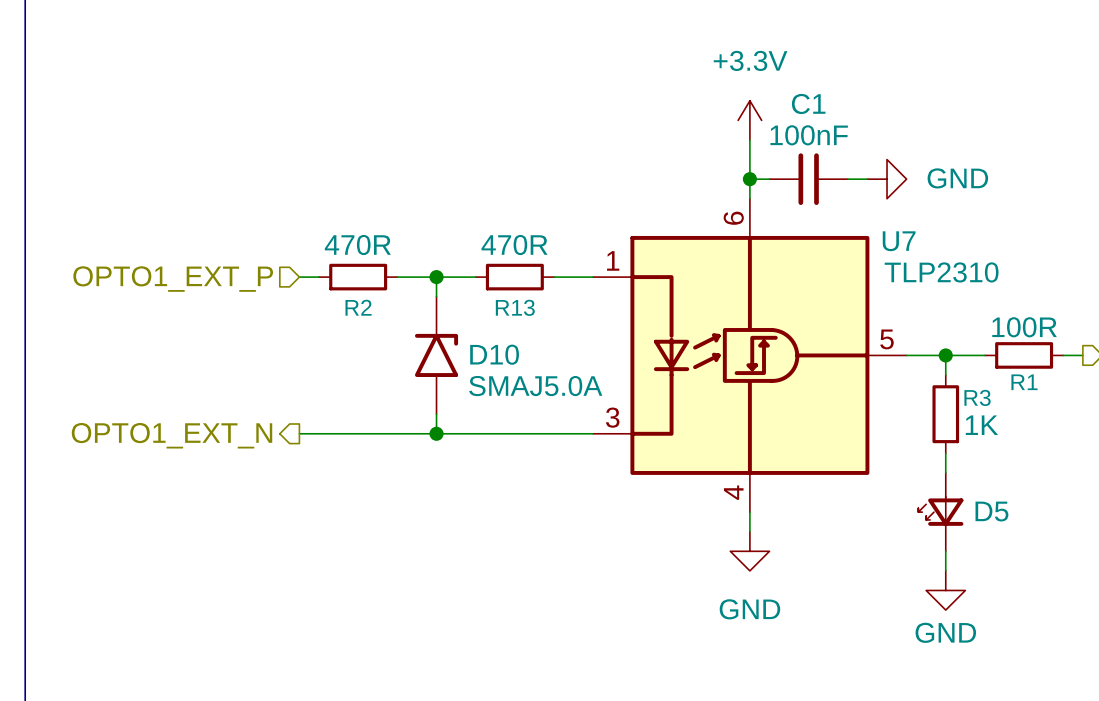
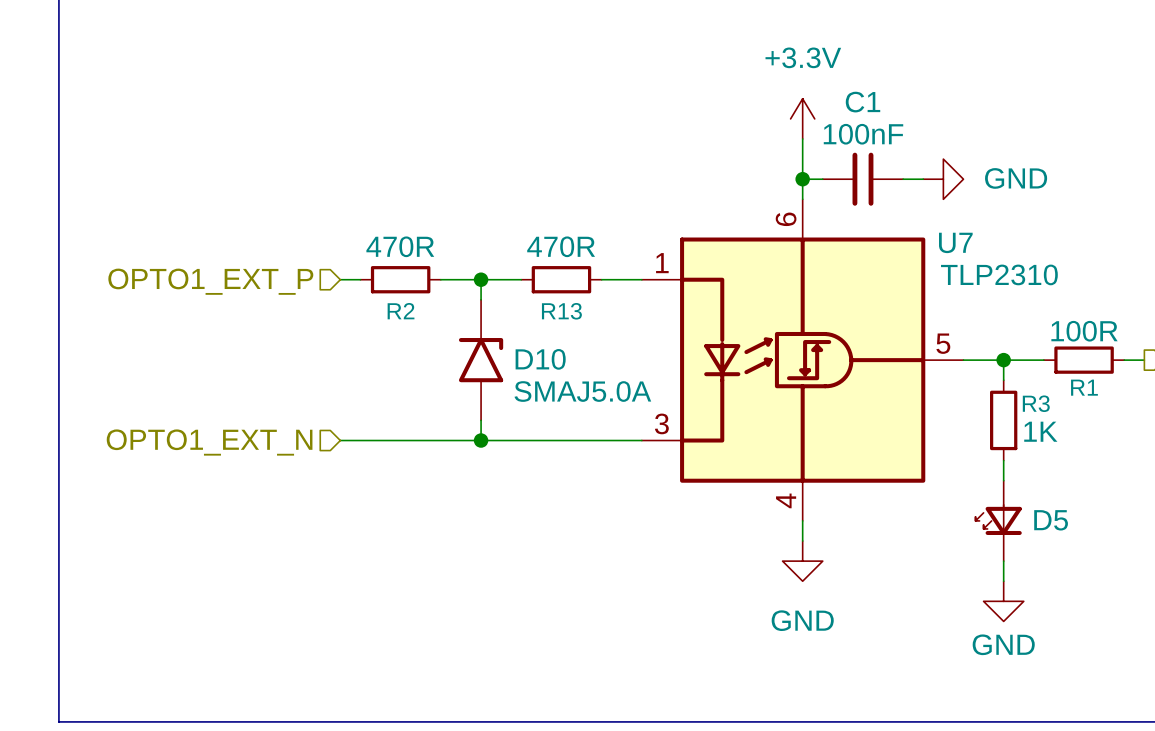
hierarchical label shape: output (172, 435) -> input (209, 442)

